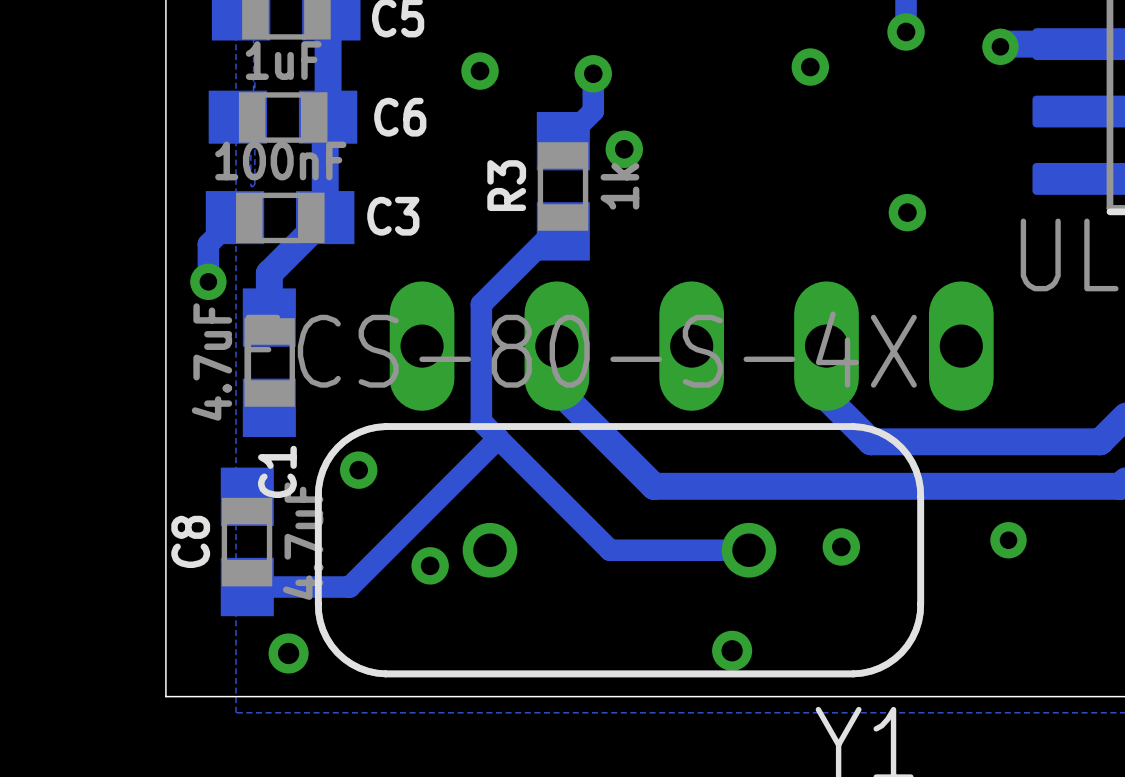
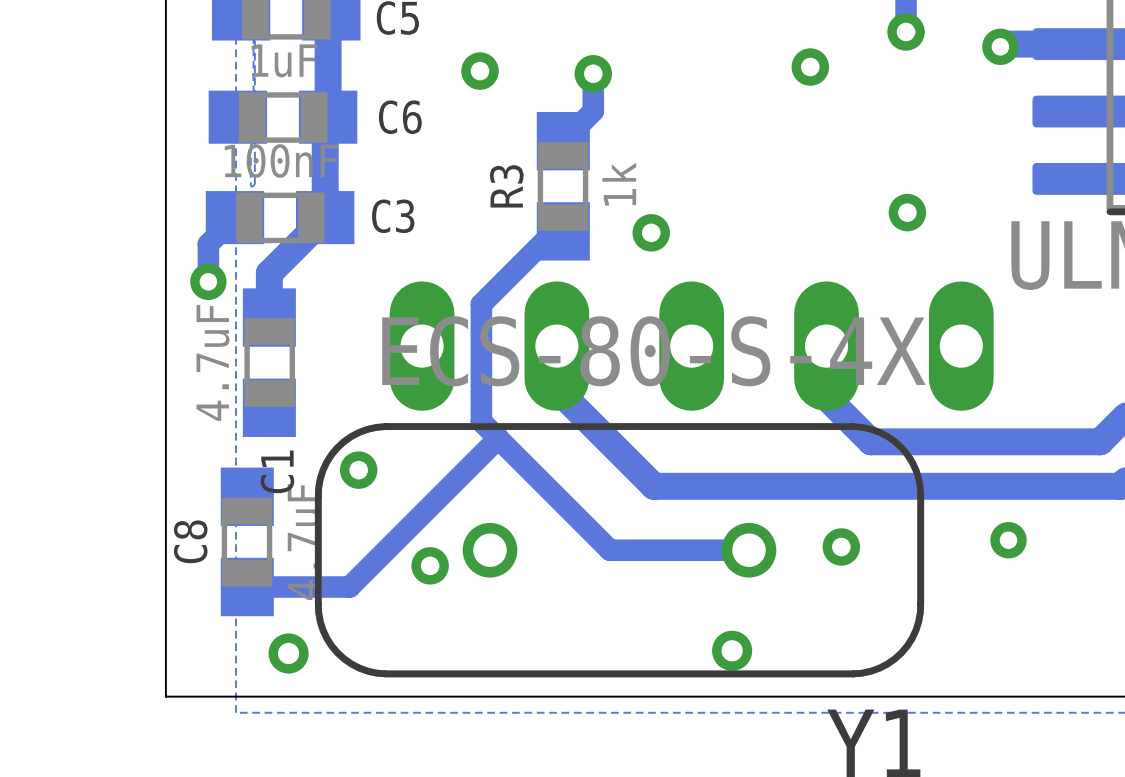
via position: (624, 149) -> (651, 232)

